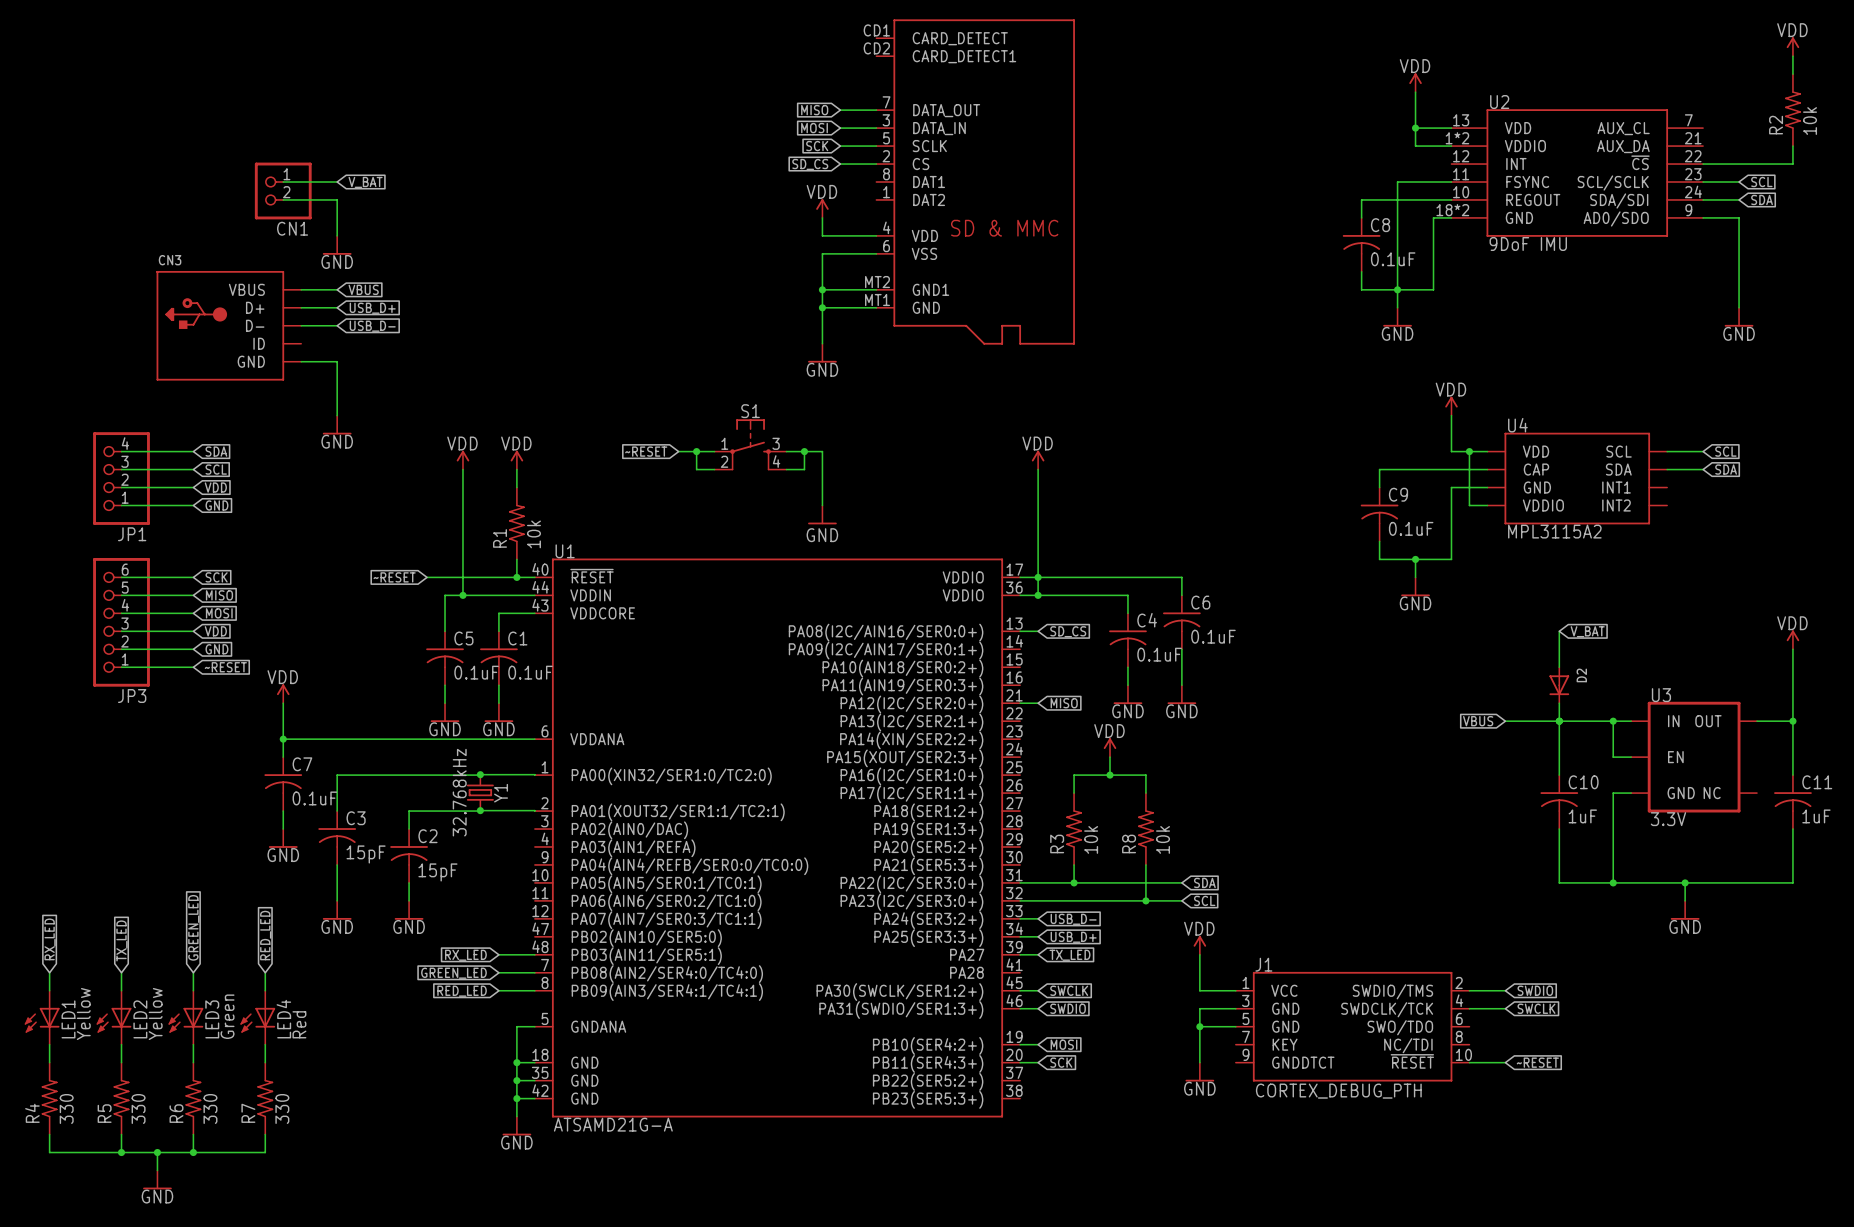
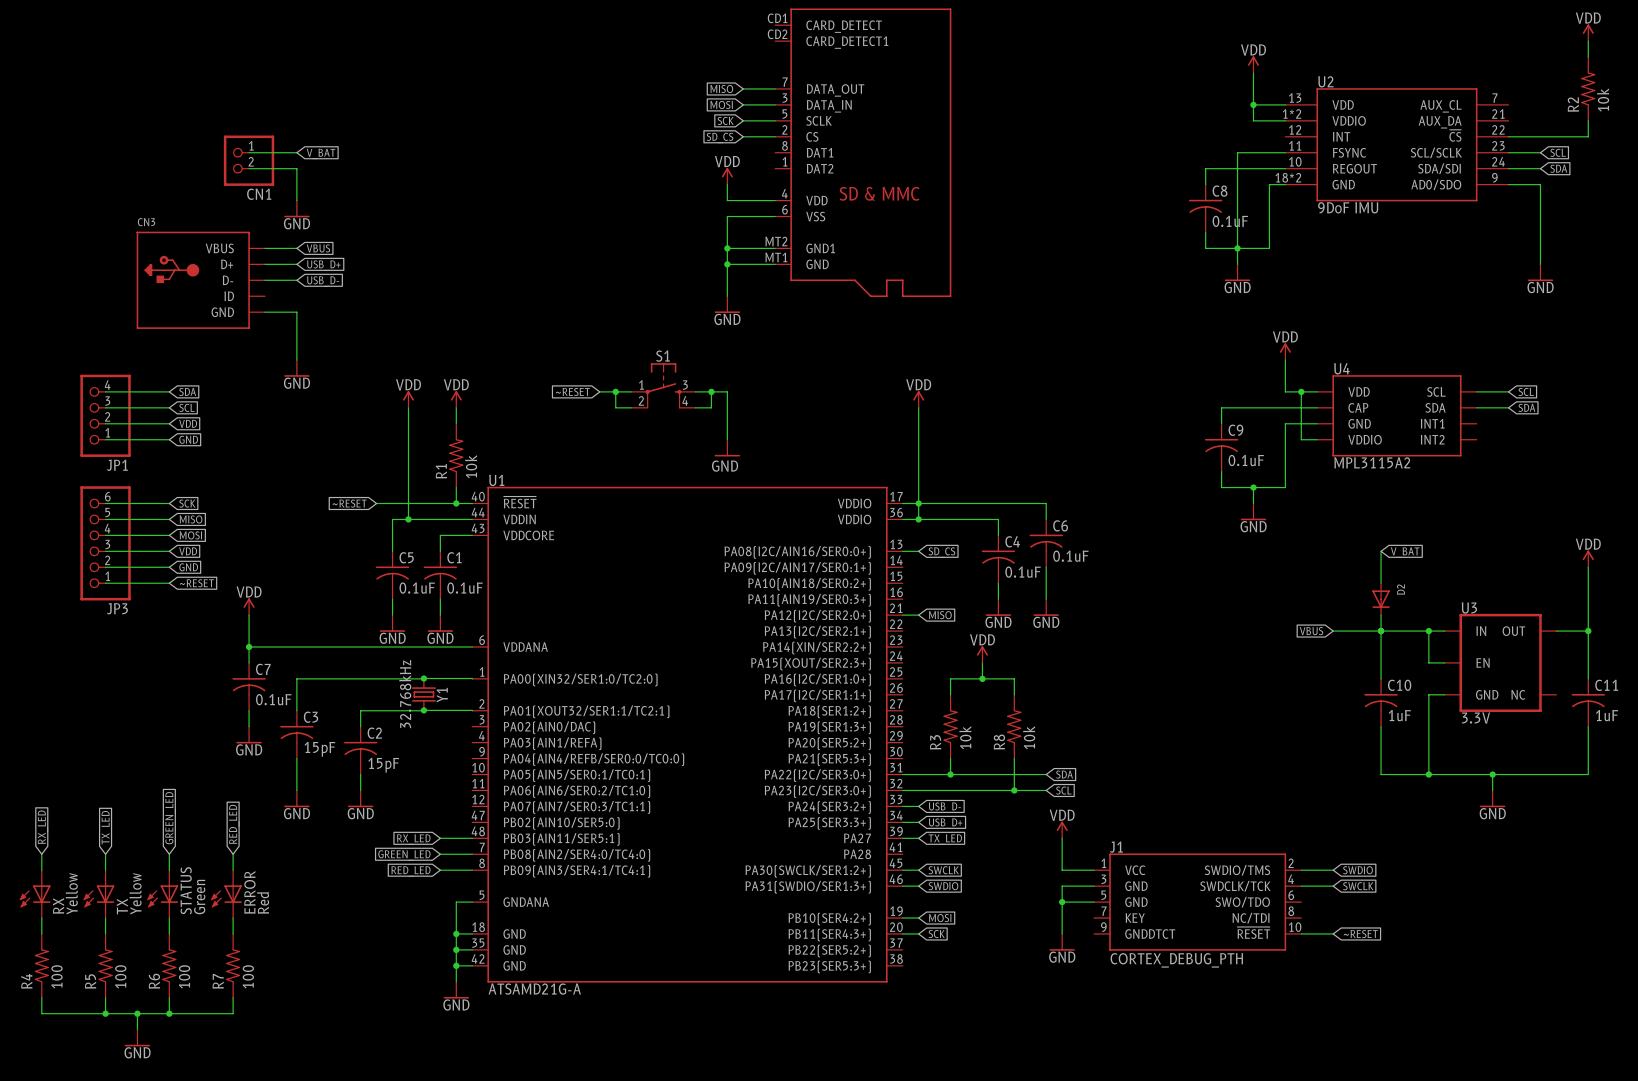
LED1 name: LED1 (68, 1019) -> RX (58, 905)
LED2 name: LED2 (140, 1019) -> TX (122, 906)
LED3 name: LED3 (212, 1019) -> STATUS (186, 890)
LED4 name: LED4 (283, 1019) -> ERROR (249, 892)
R4 value: 330 (66, 1108) -> 100 (57, 976)
R5 value: 330 (138, 1108) -> 100 (120, 976)
R6 value: 330 (210, 1108) -> 100 (184, 976)
R7 value: 330 (282, 1108) -> 100 (248, 976)

